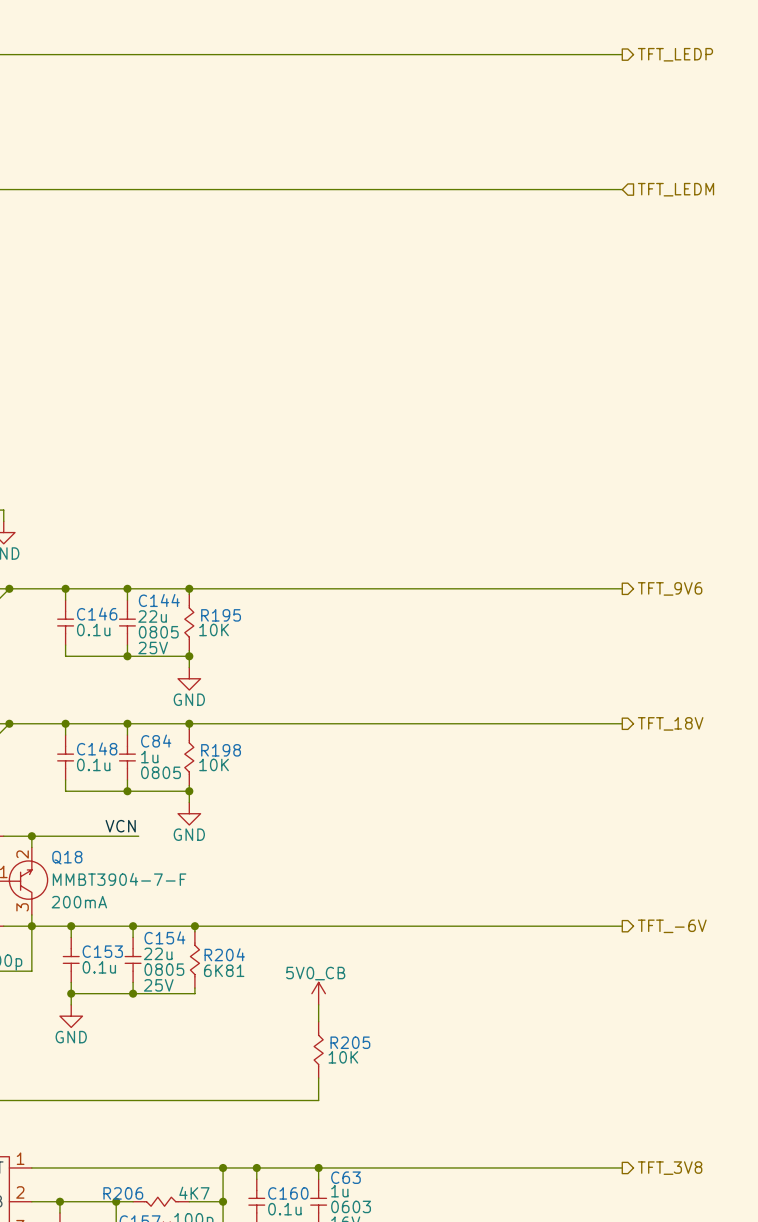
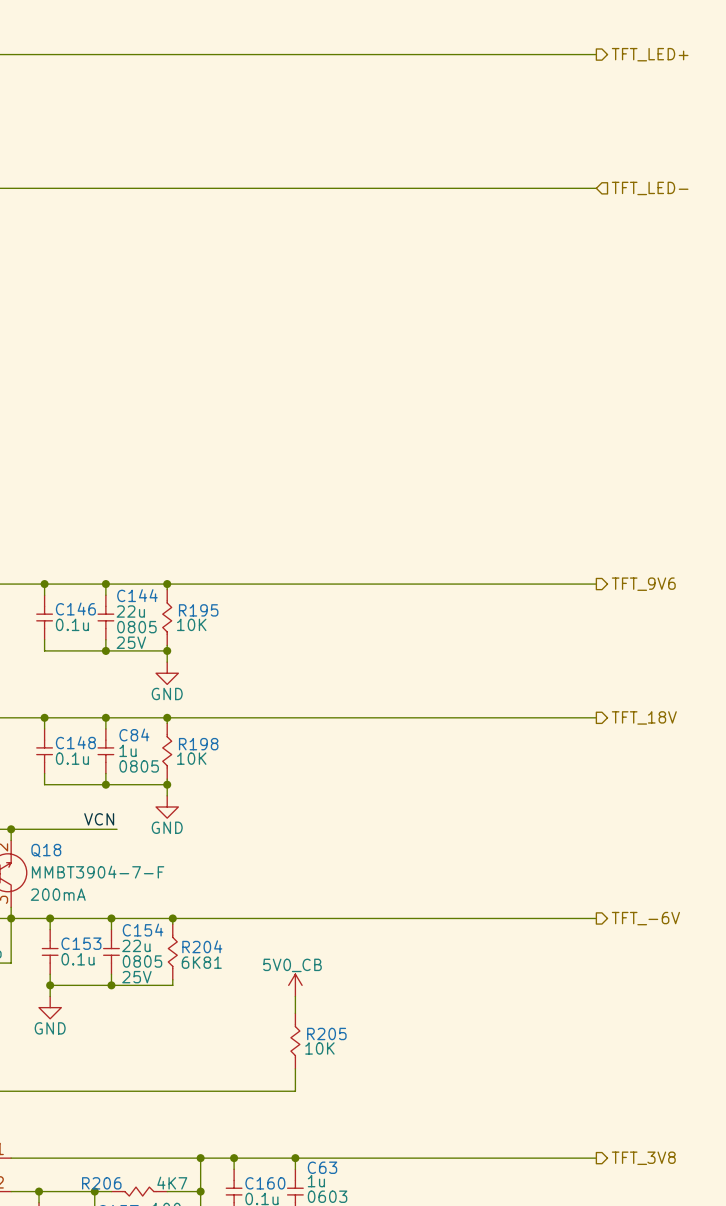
hierarchical label: TFT_LEDP (675, 54) -> TFT_LED+ (650, 54)
hierarchical label: TFT_LEDM (676, 189) -> TFT_LED- (650, 188)

